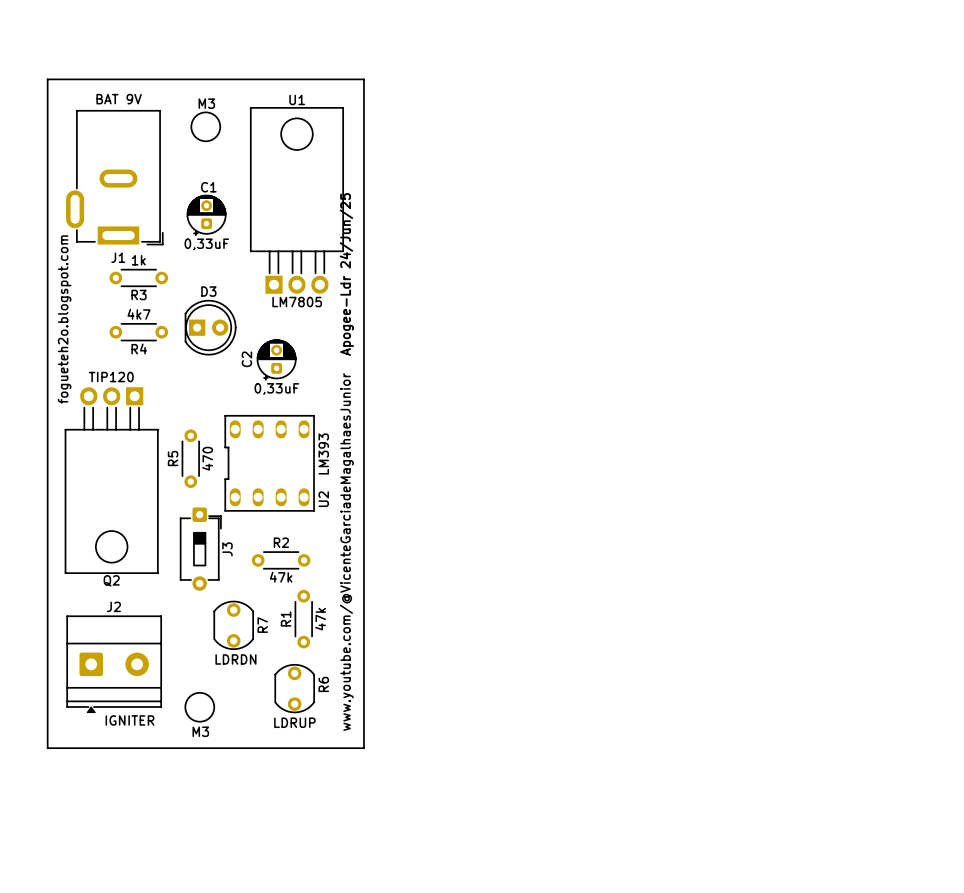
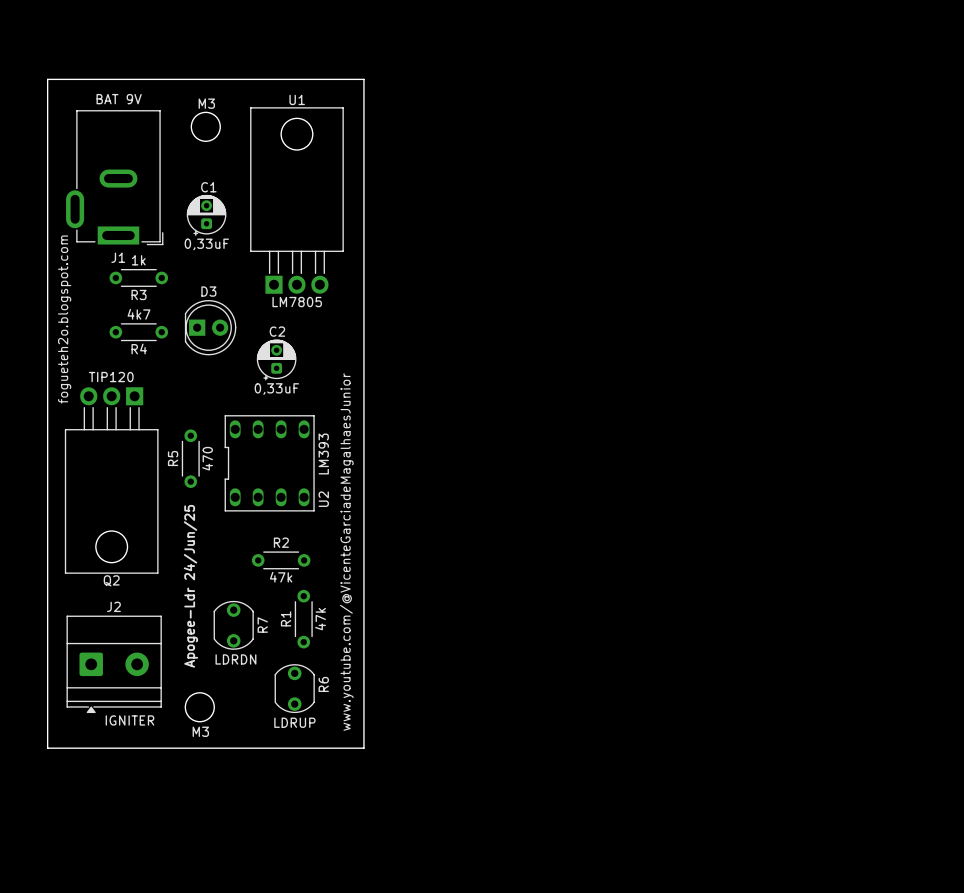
text: Apogee-Ldr 24/Jun/25 (346, 274) -> none
C2 name rotation: 0° (246, 359) -> 90° clockwise (277, 331)
C2 name position: C2 (246, 359) -> C2 (277, 331)
J3: (200, 549) -> none
text: none -> Apogee-Ldr 24/Jun/25 (190, 586)

